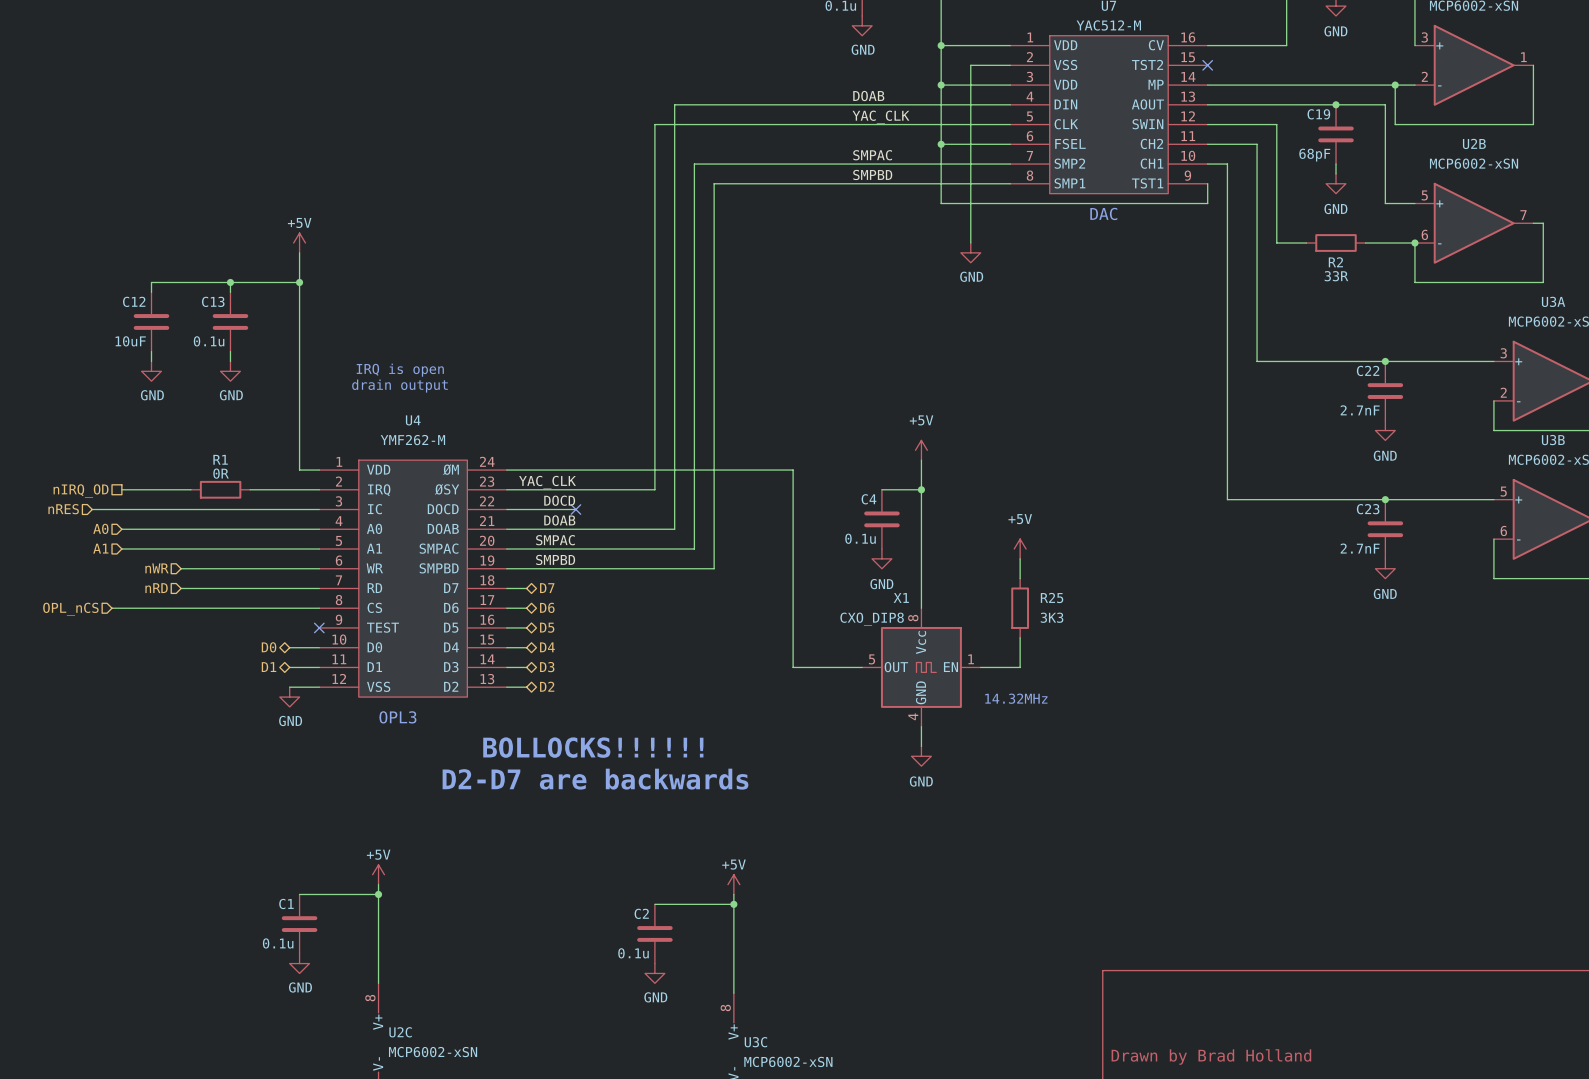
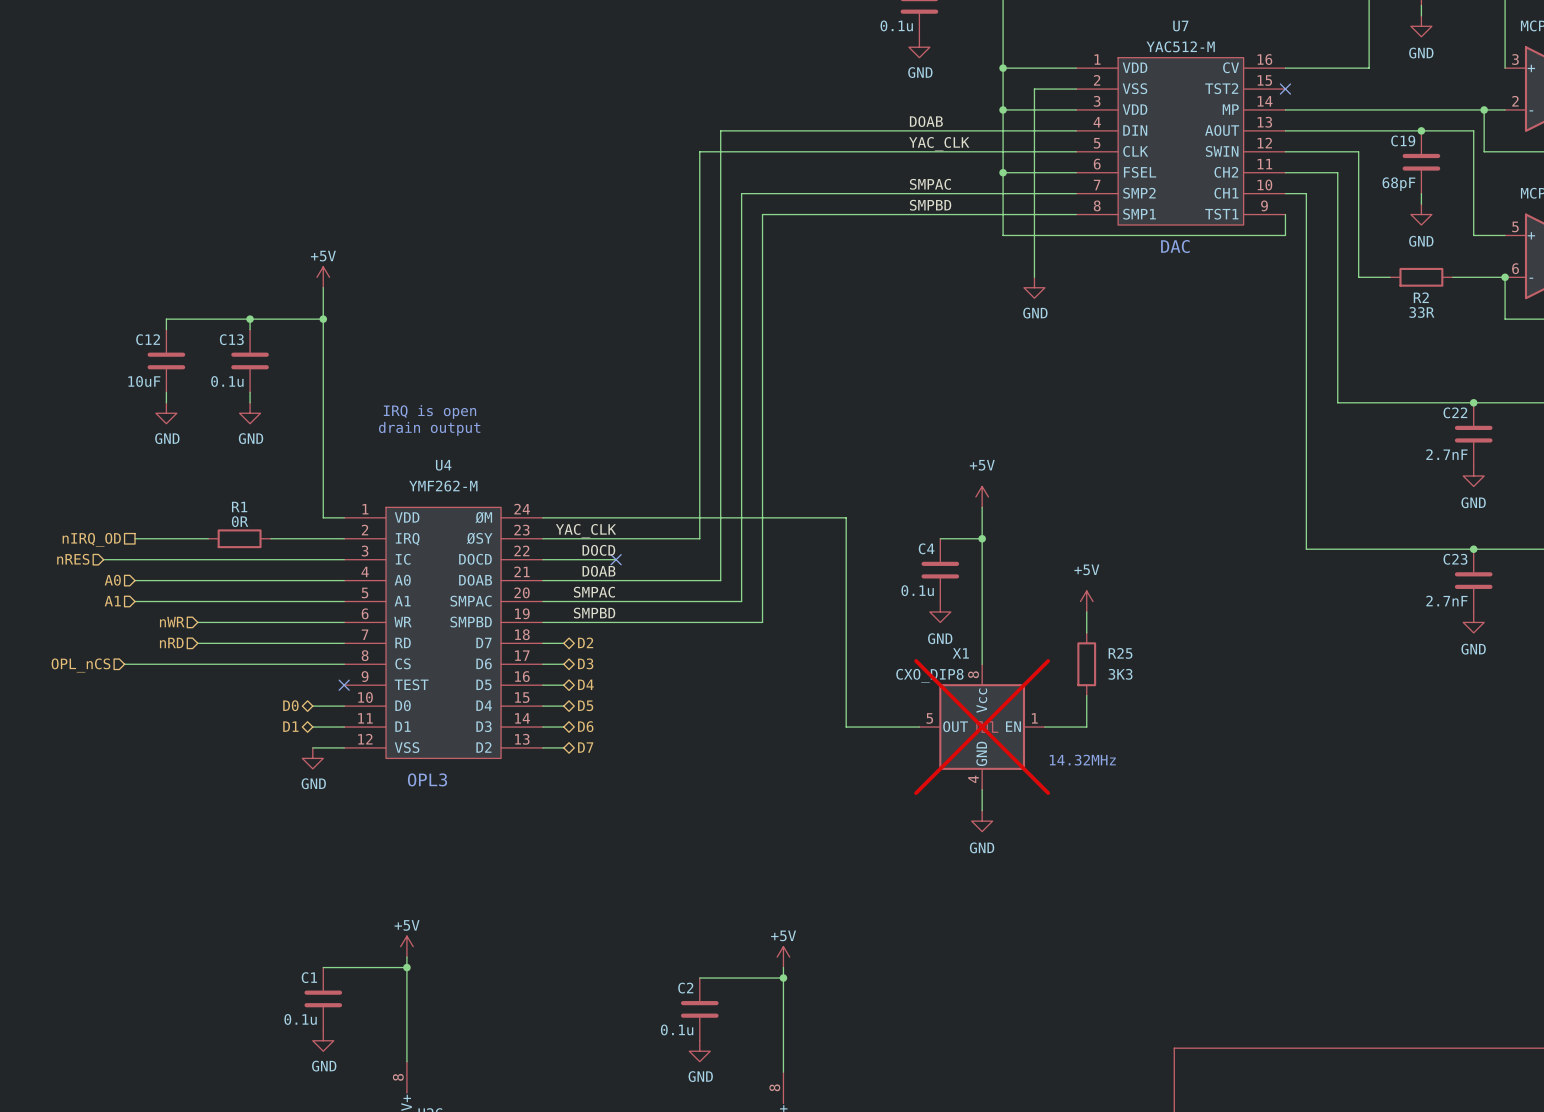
hierarchical label: D7 (547, 588) -> D2 (585, 642)
hierarchical label: D6 (547, 607) -> D3 (585, 663)
hierarchical label: D5 (547, 627) -> D4 (585, 684)
hierarchical label: D4 (547, 647) -> D5 (585, 705)
hierarchical label: D3 (547, 667) -> D6 (585, 726)
X1 do-not-place cross: none -> (982, 727)
hierarchical label: D2 (547, 686) -> D7 (585, 747)
text: BOLLOCKS!!!!!! (593, 747) -> none
text: D2-D7 are backwards (595, 779) -> none

